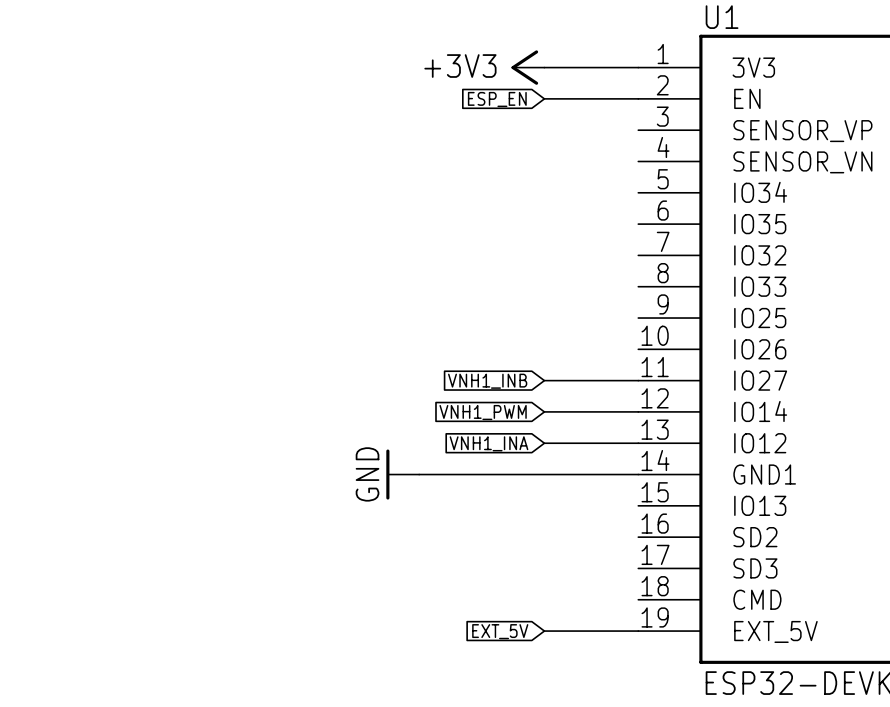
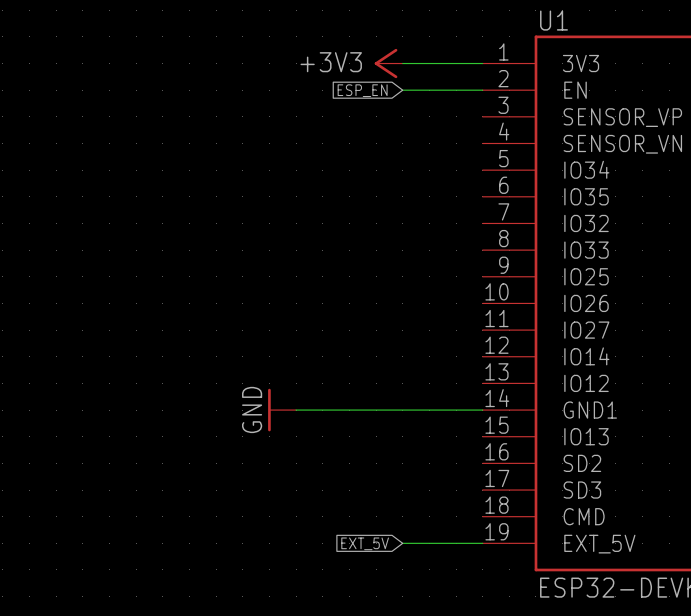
wire: (544, 380) (638, 380) -> none
global label: VNH1_INB (487, 381) -> none
wire: (544, 411) (638, 411) -> none
global label: VNH1_PWM (483, 412) -> none
global label: VNH1_INA (488, 443) -> none
wire: (544, 443) (638, 443) -> none

